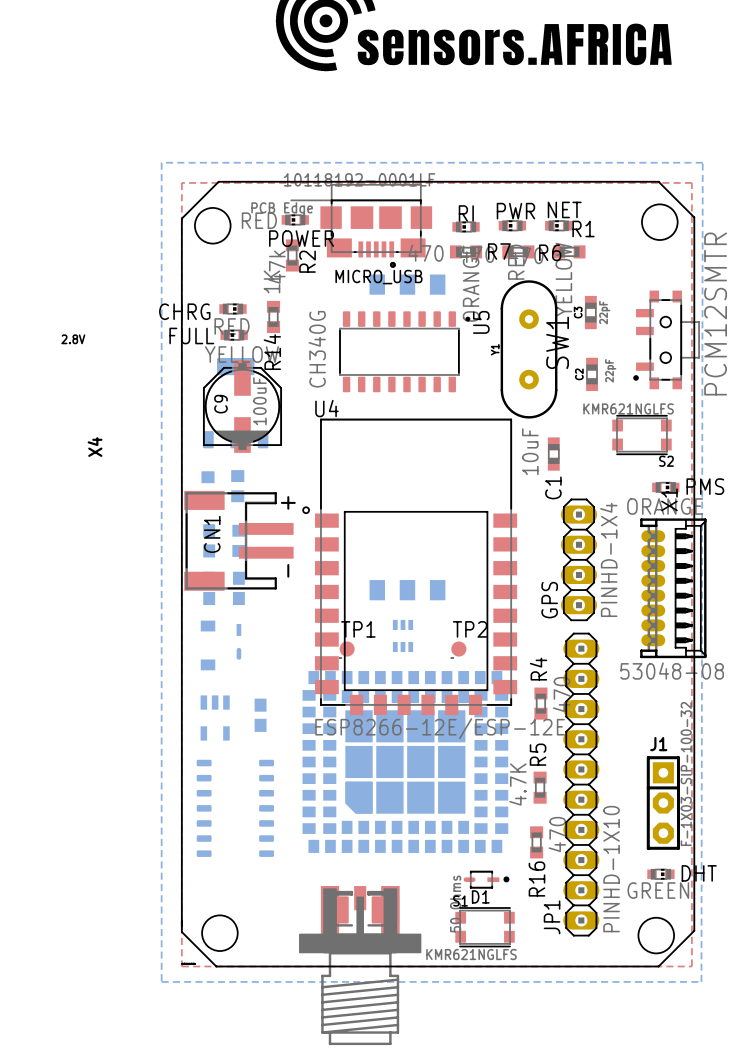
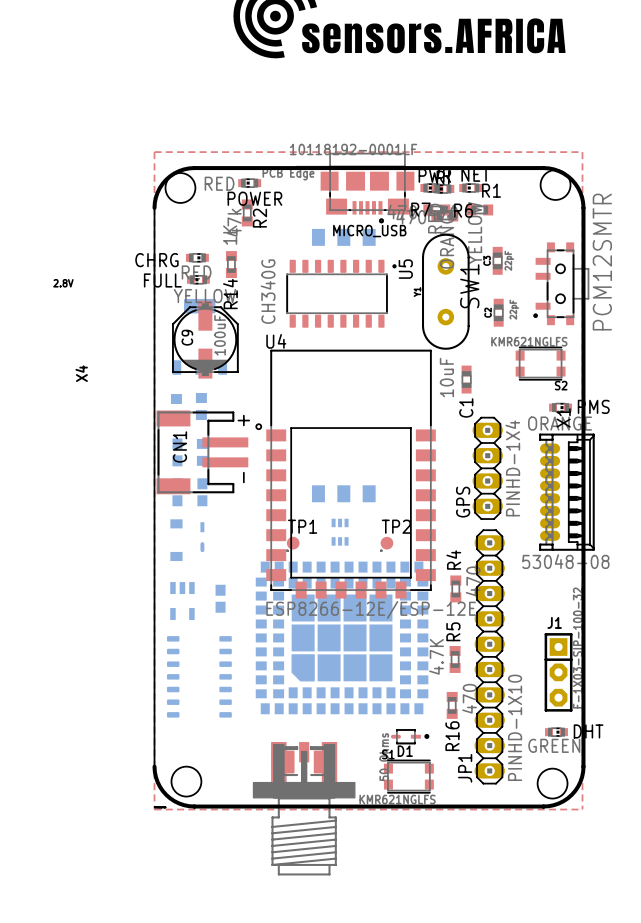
bottom zone outline: (161, 162) (702, 162) (701, 981) (161, 981) (161, 162) -> none
MICRO_USB position: (361, 225) -> (354, 188)
RI position: (466, 226) -> (442, 189)
board edge: (181, 249) (181, 218) (218, 181) (658, 181) (694, 217) (694, 930) (658, 966) (216, 966) (181, 932) (181, 915) -> (154, 207) (157, 192) (166, 179) (179, 171) (194, 168) (548, 168) (563, 173) (571, 179) (580, 192) (583, 207) (583, 766) (582, 776) (575, 790) (563, 801) (543, 806) (194, 806) (179, 803) (166, 794) (157, 781) (154, 766)
R7 position: (466, 251) -> (444, 215)

